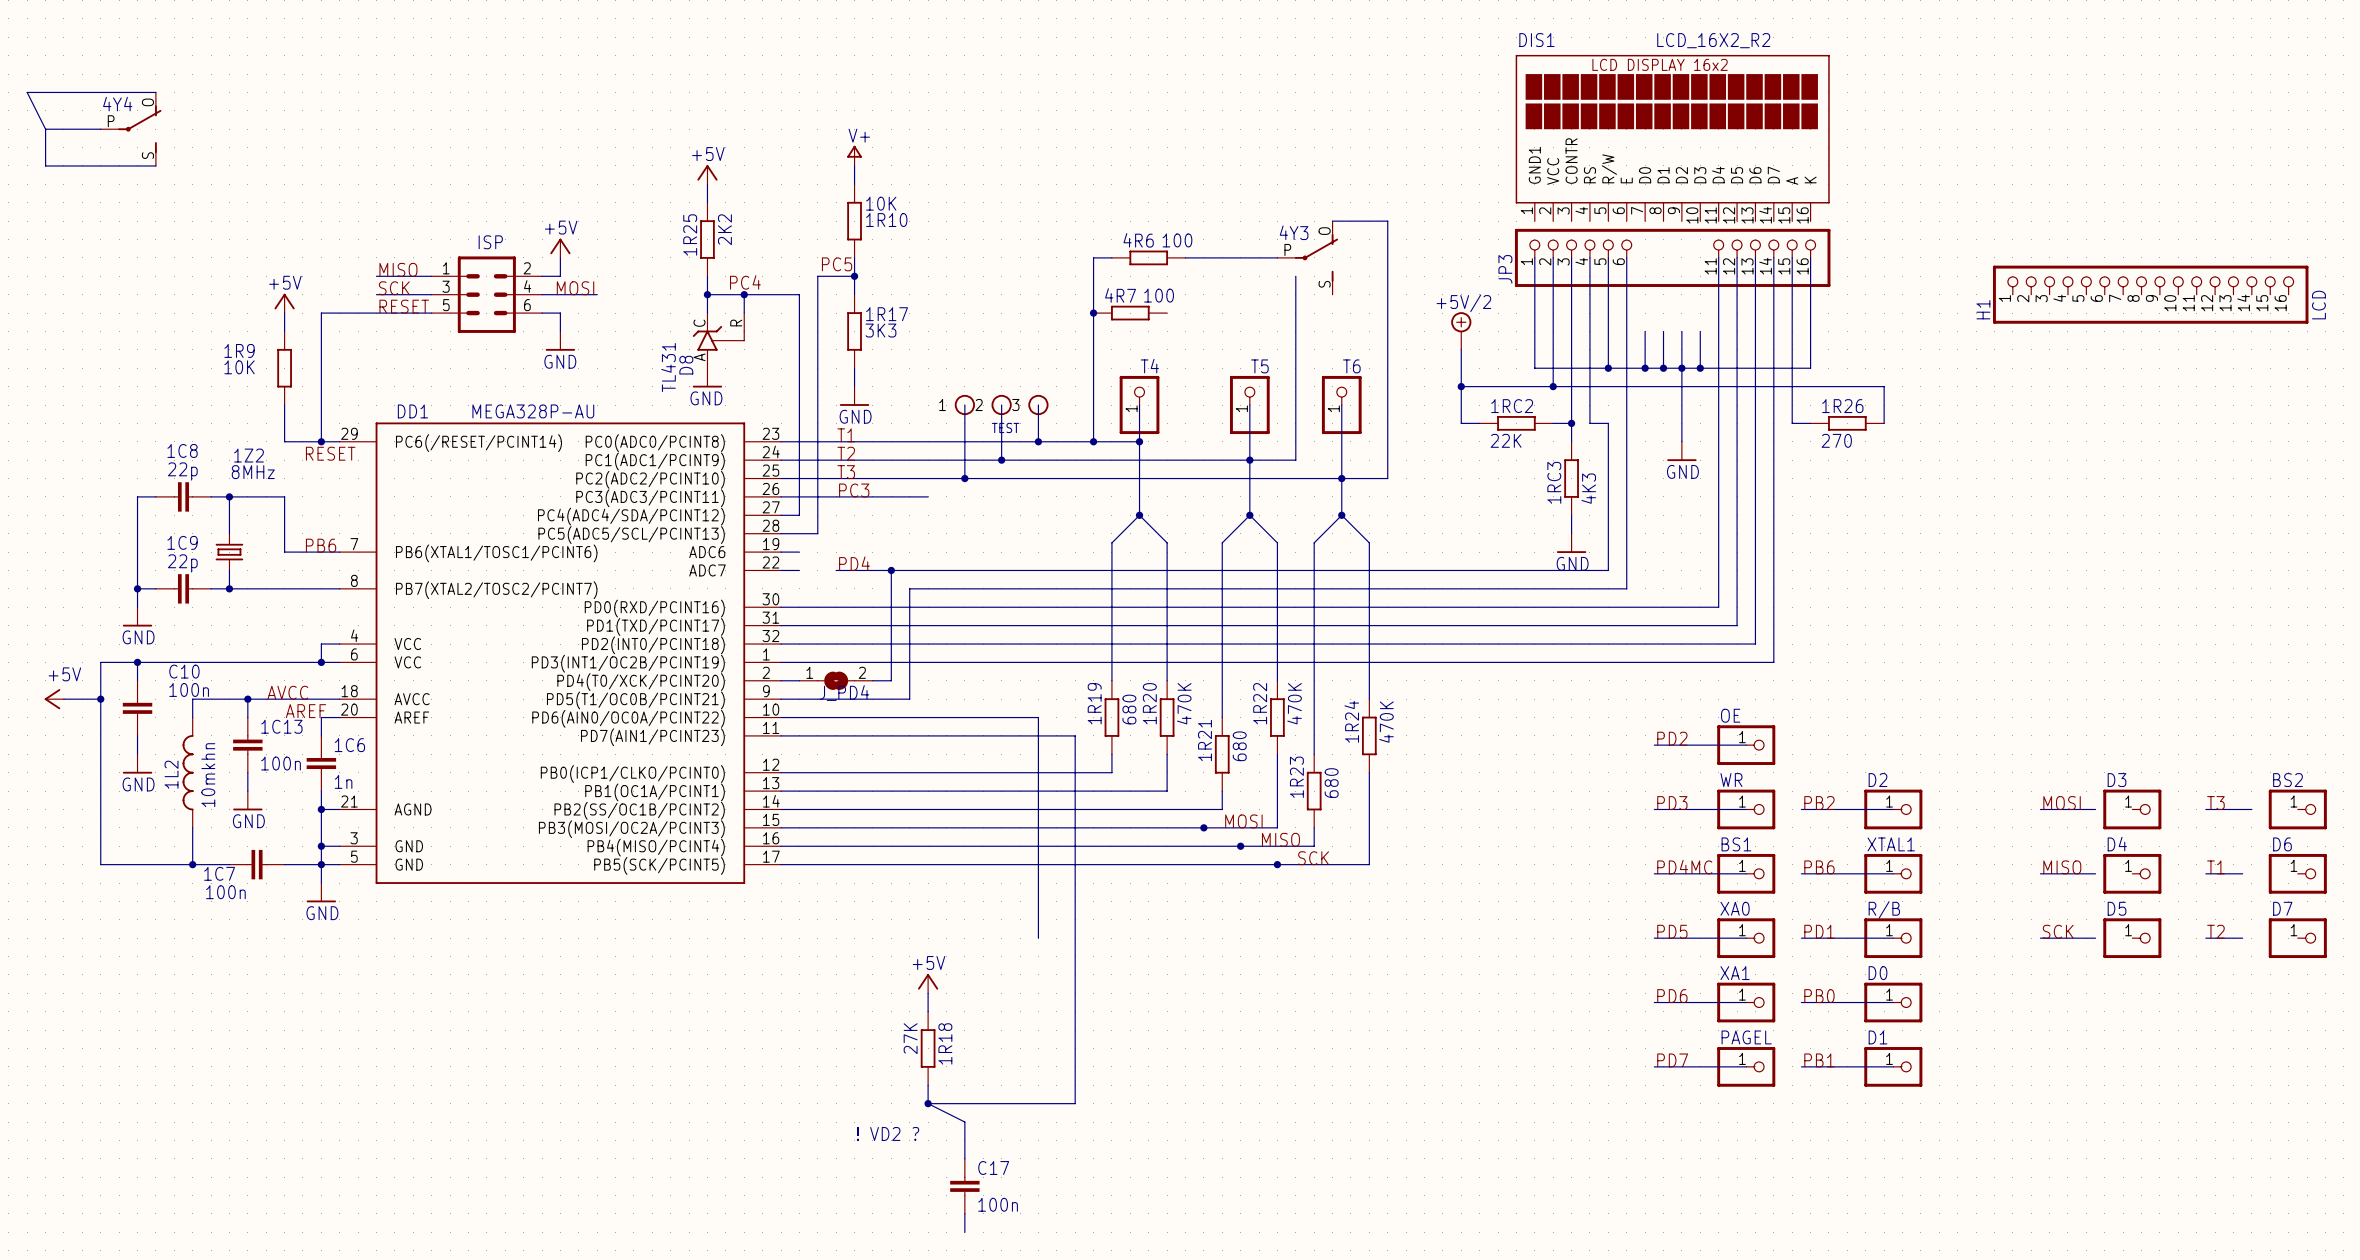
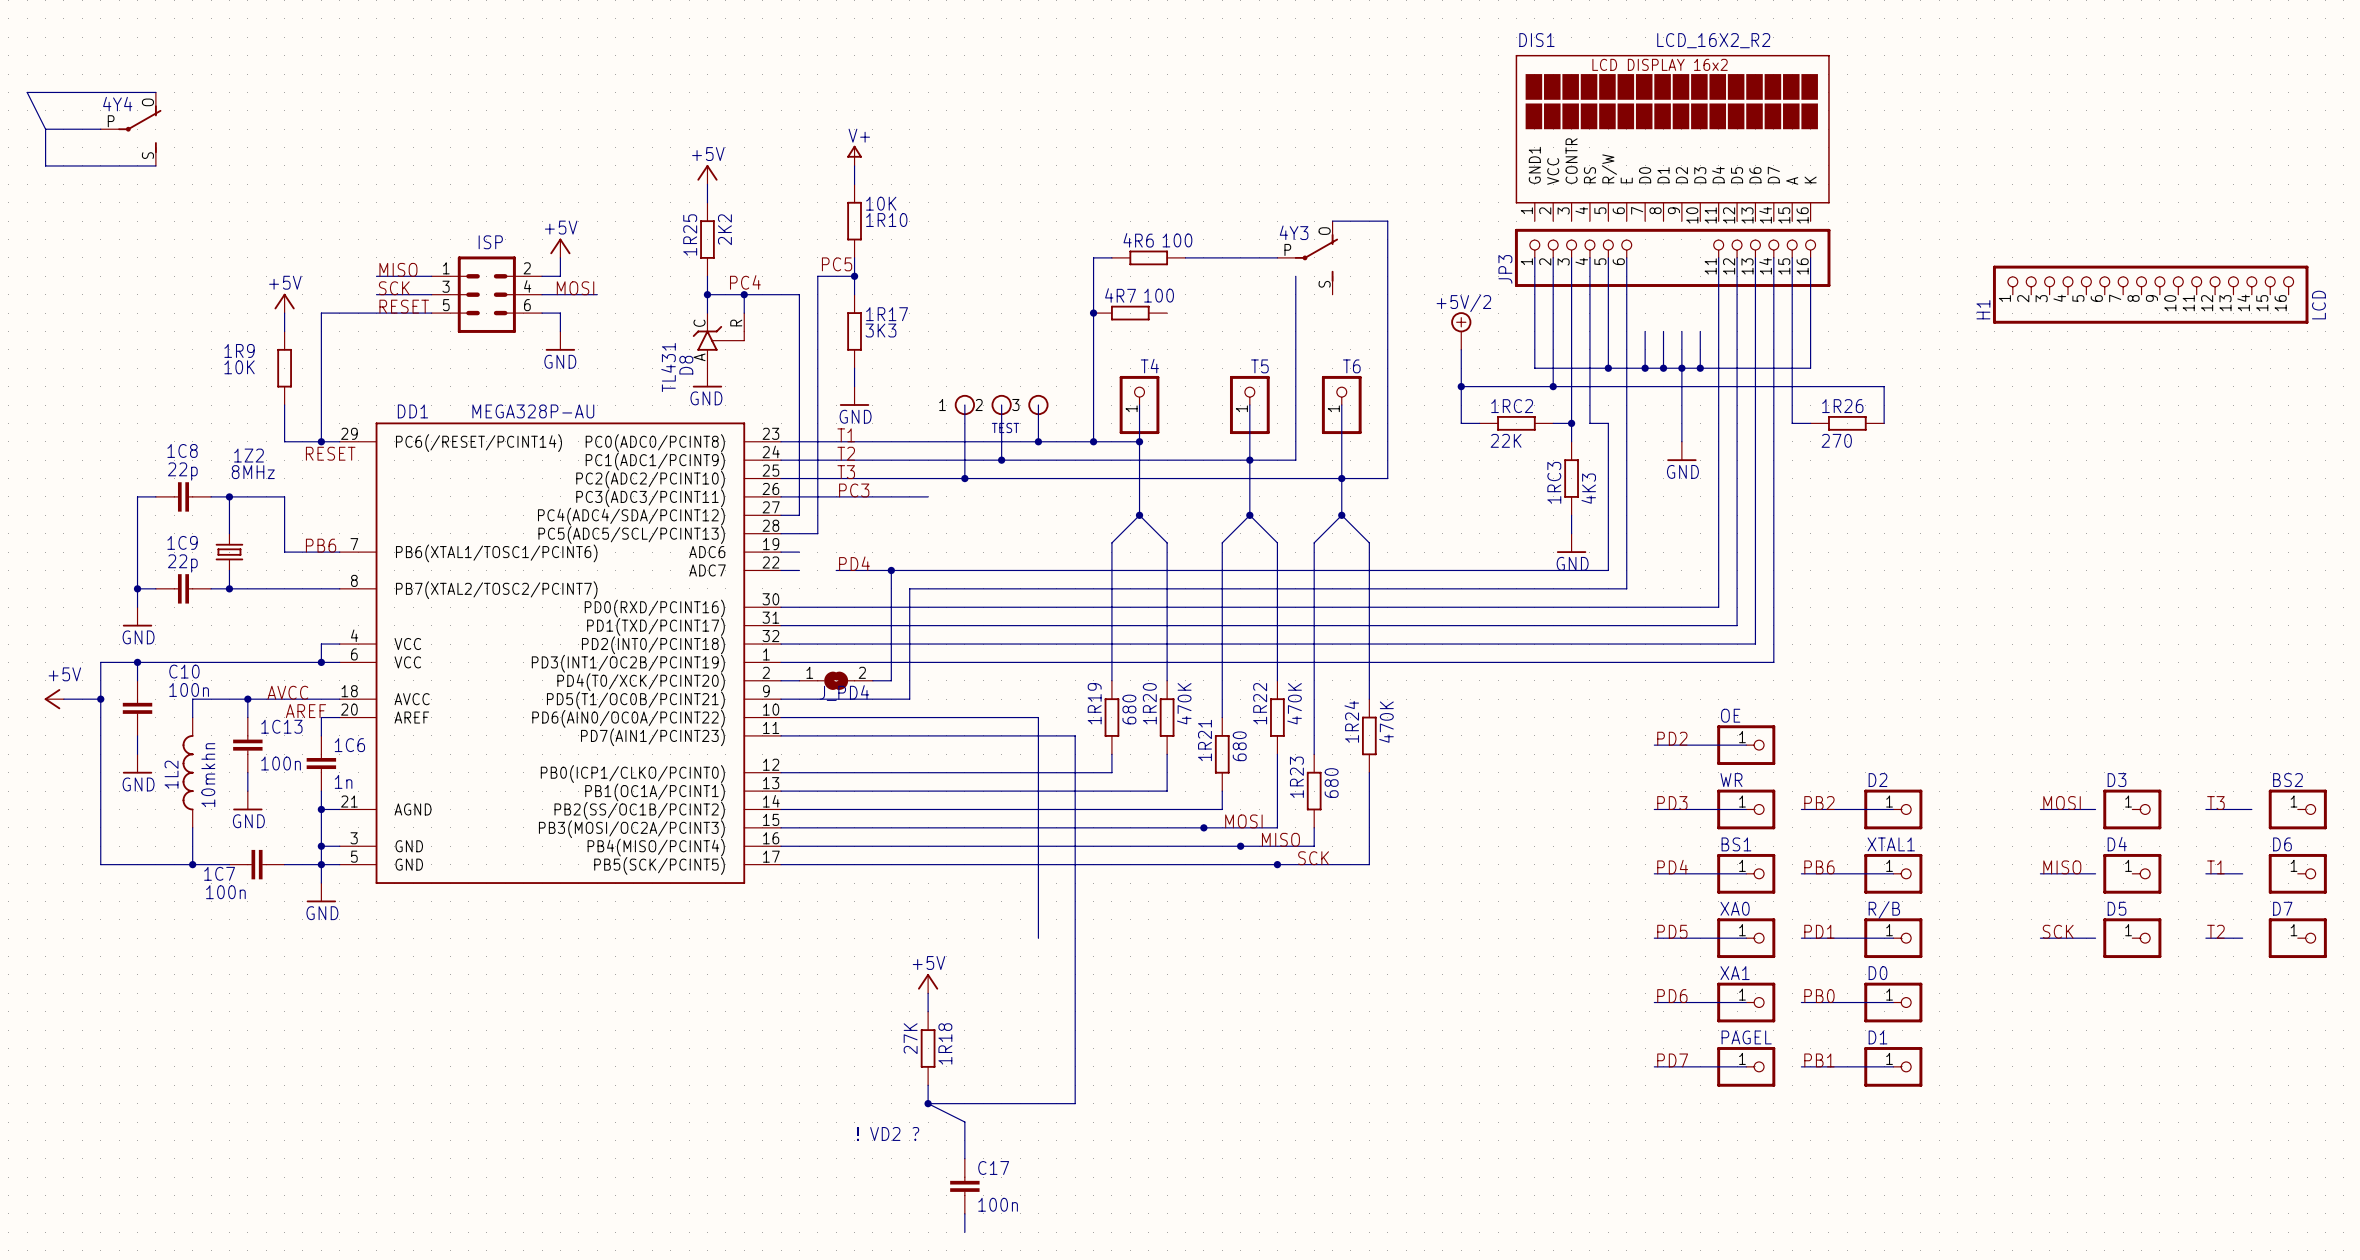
label: PD4MC (1684, 867) -> PD4 (1672, 867)

